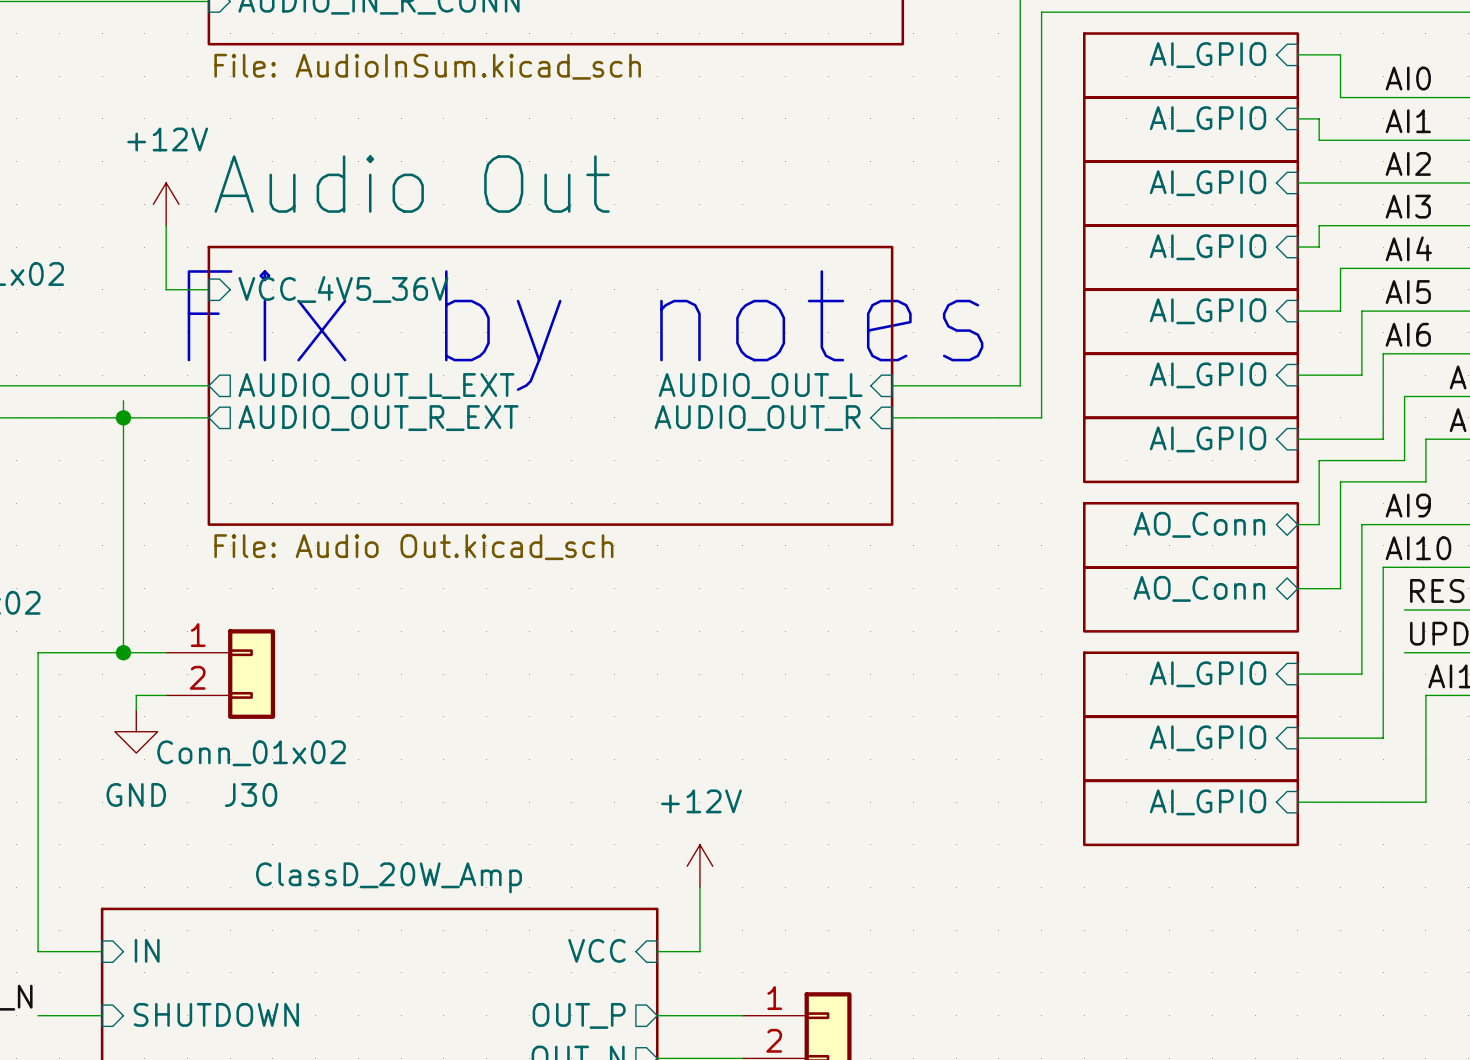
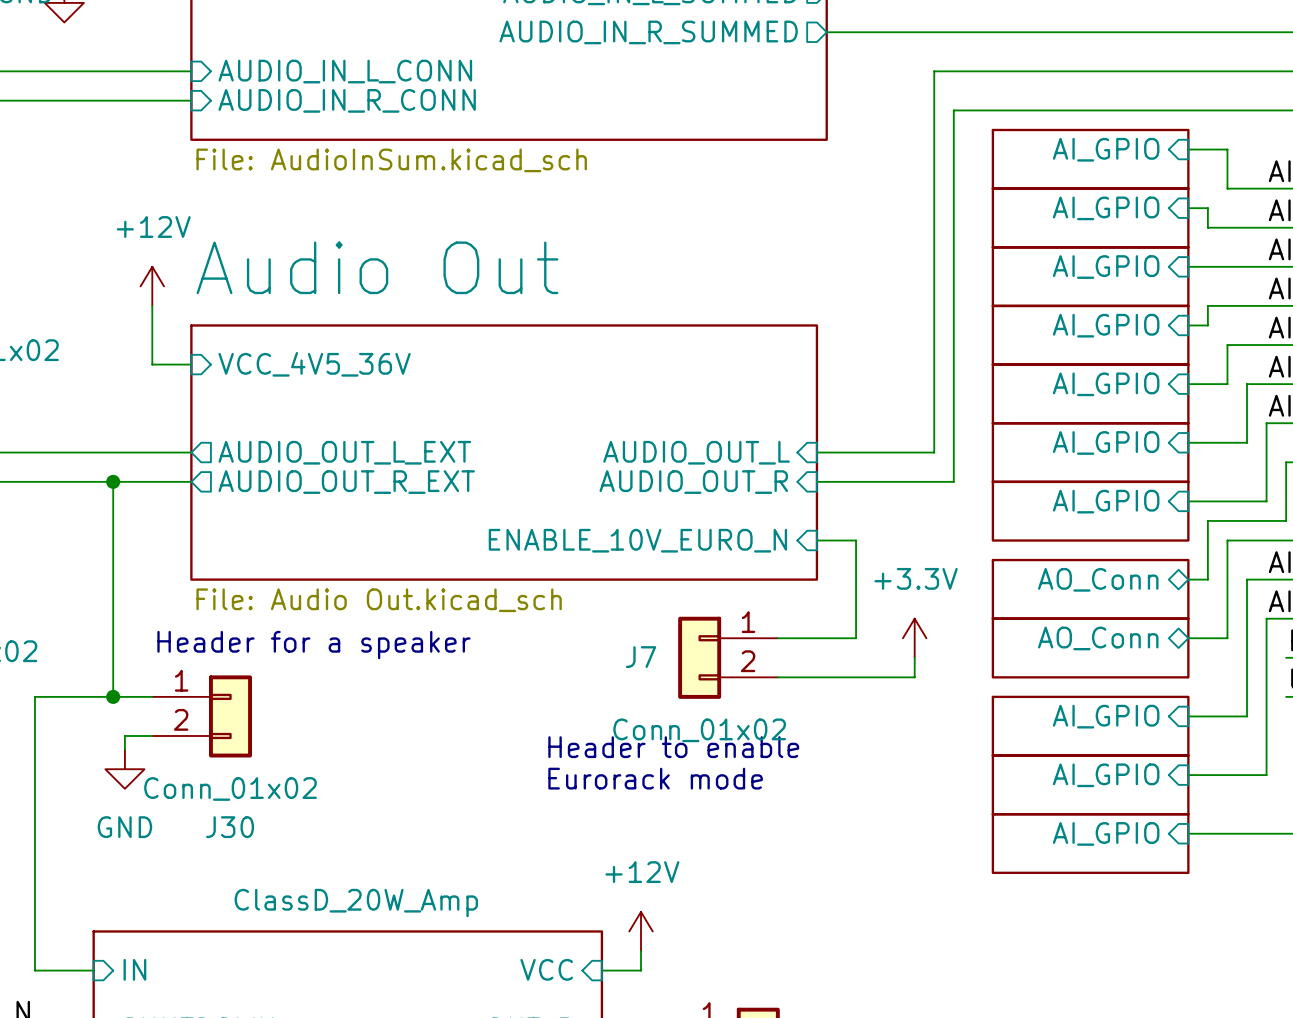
text: Fix by notes (585, 330) -> none
wire: (123, 400) (123, 417) -> none
wire: none -> (816, 540) (856, 540) (856, 638) (777, 638)
sheet pin: none -> ENABLE_10V_EURO_N (637, 540)
power symbol: none -> +3.3V (914, 638)
text: none -> Header for a speaker (313, 645)
J7: none -> Conn_01x02 (728, 657)
wire: none -> (914, 657) (914, 677) (777, 677)
text: none -> Header to enable (673, 747)
text: none -> Eurorack mode (655, 778)
power symbol position: +12V (699, 866) -> +12V (641, 931)

